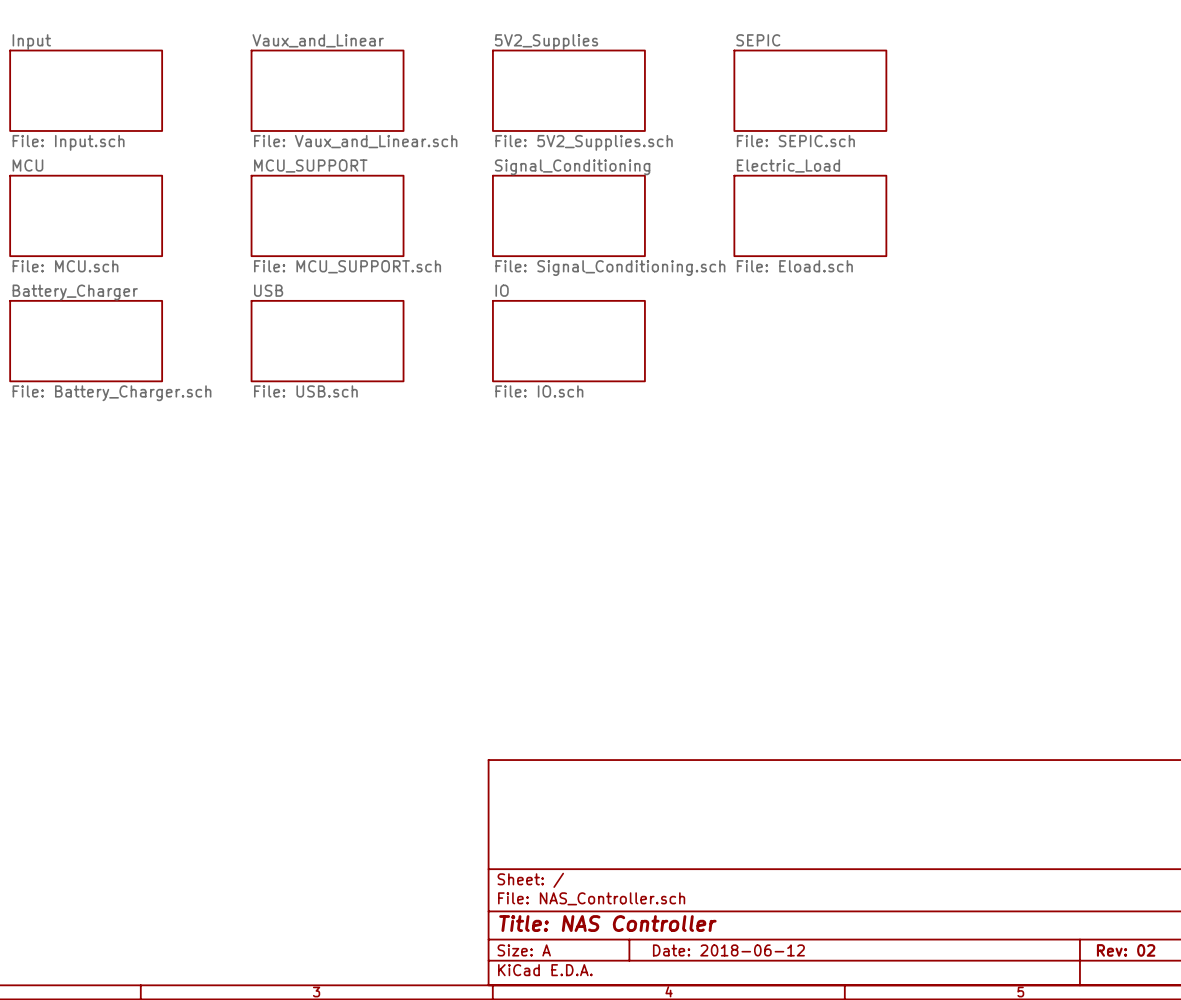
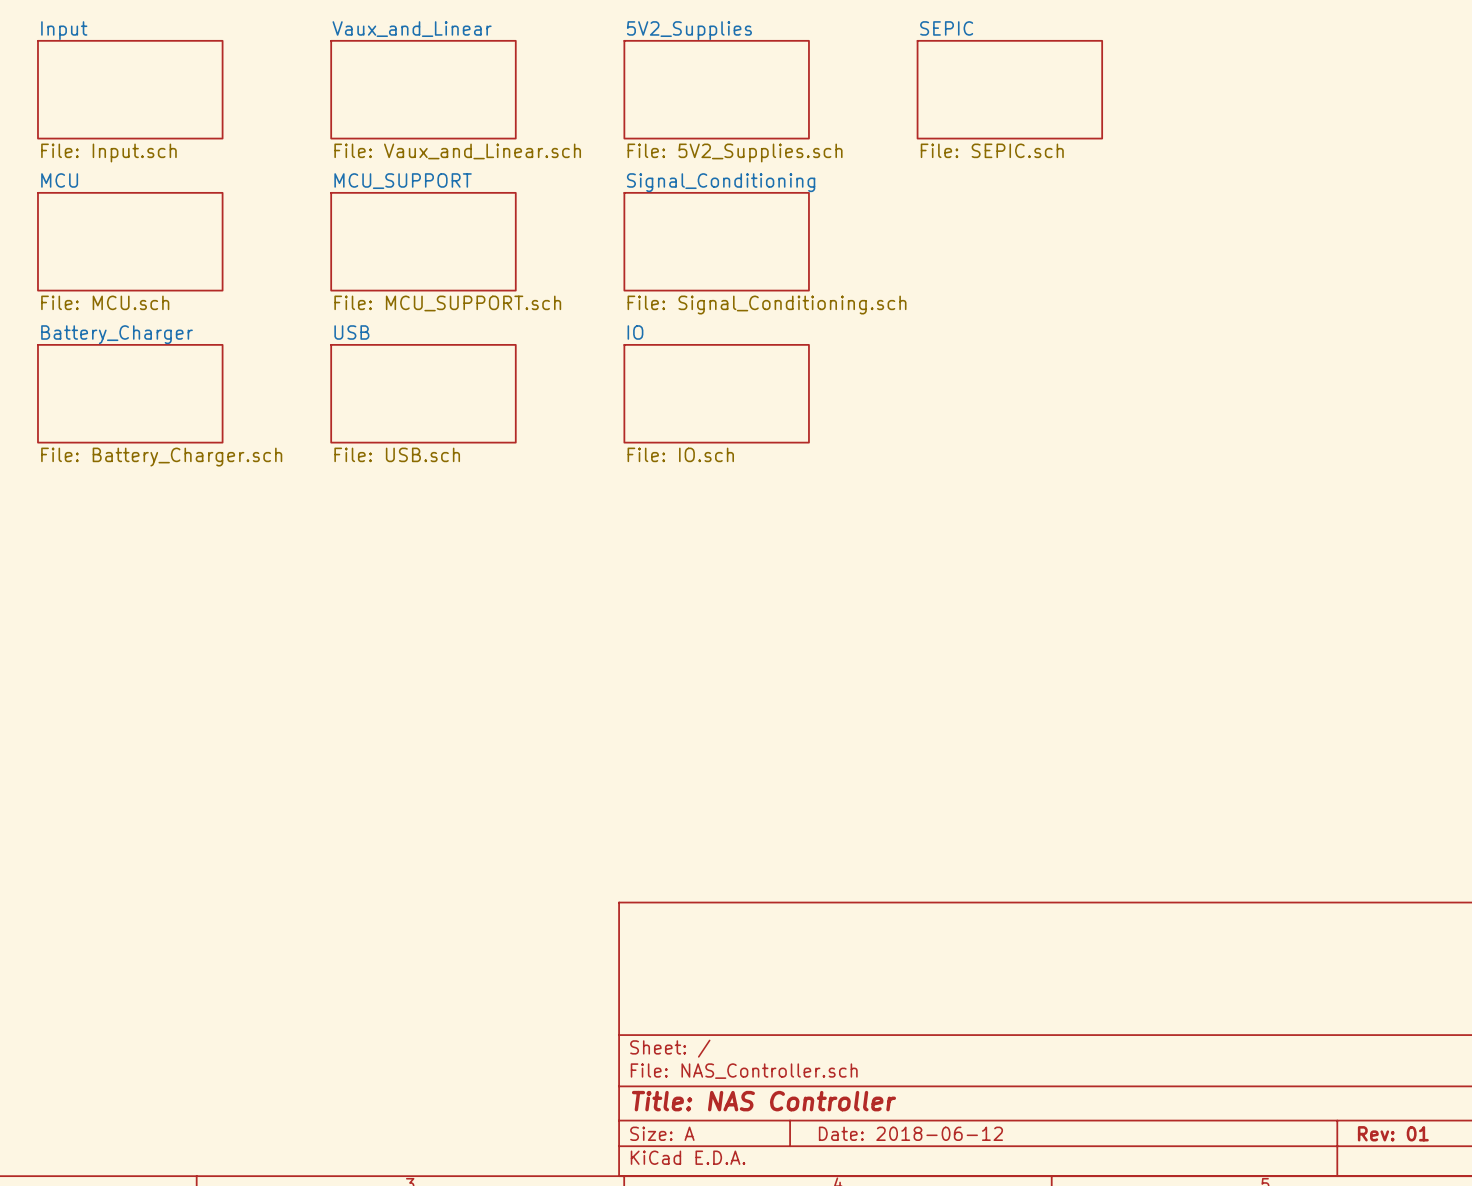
sheet Electric_Load: File: Eload.sch (810, 215) -> none
title block: Rev: 02 (1126, 950) -> Rev: 01 (1393, 1133)

